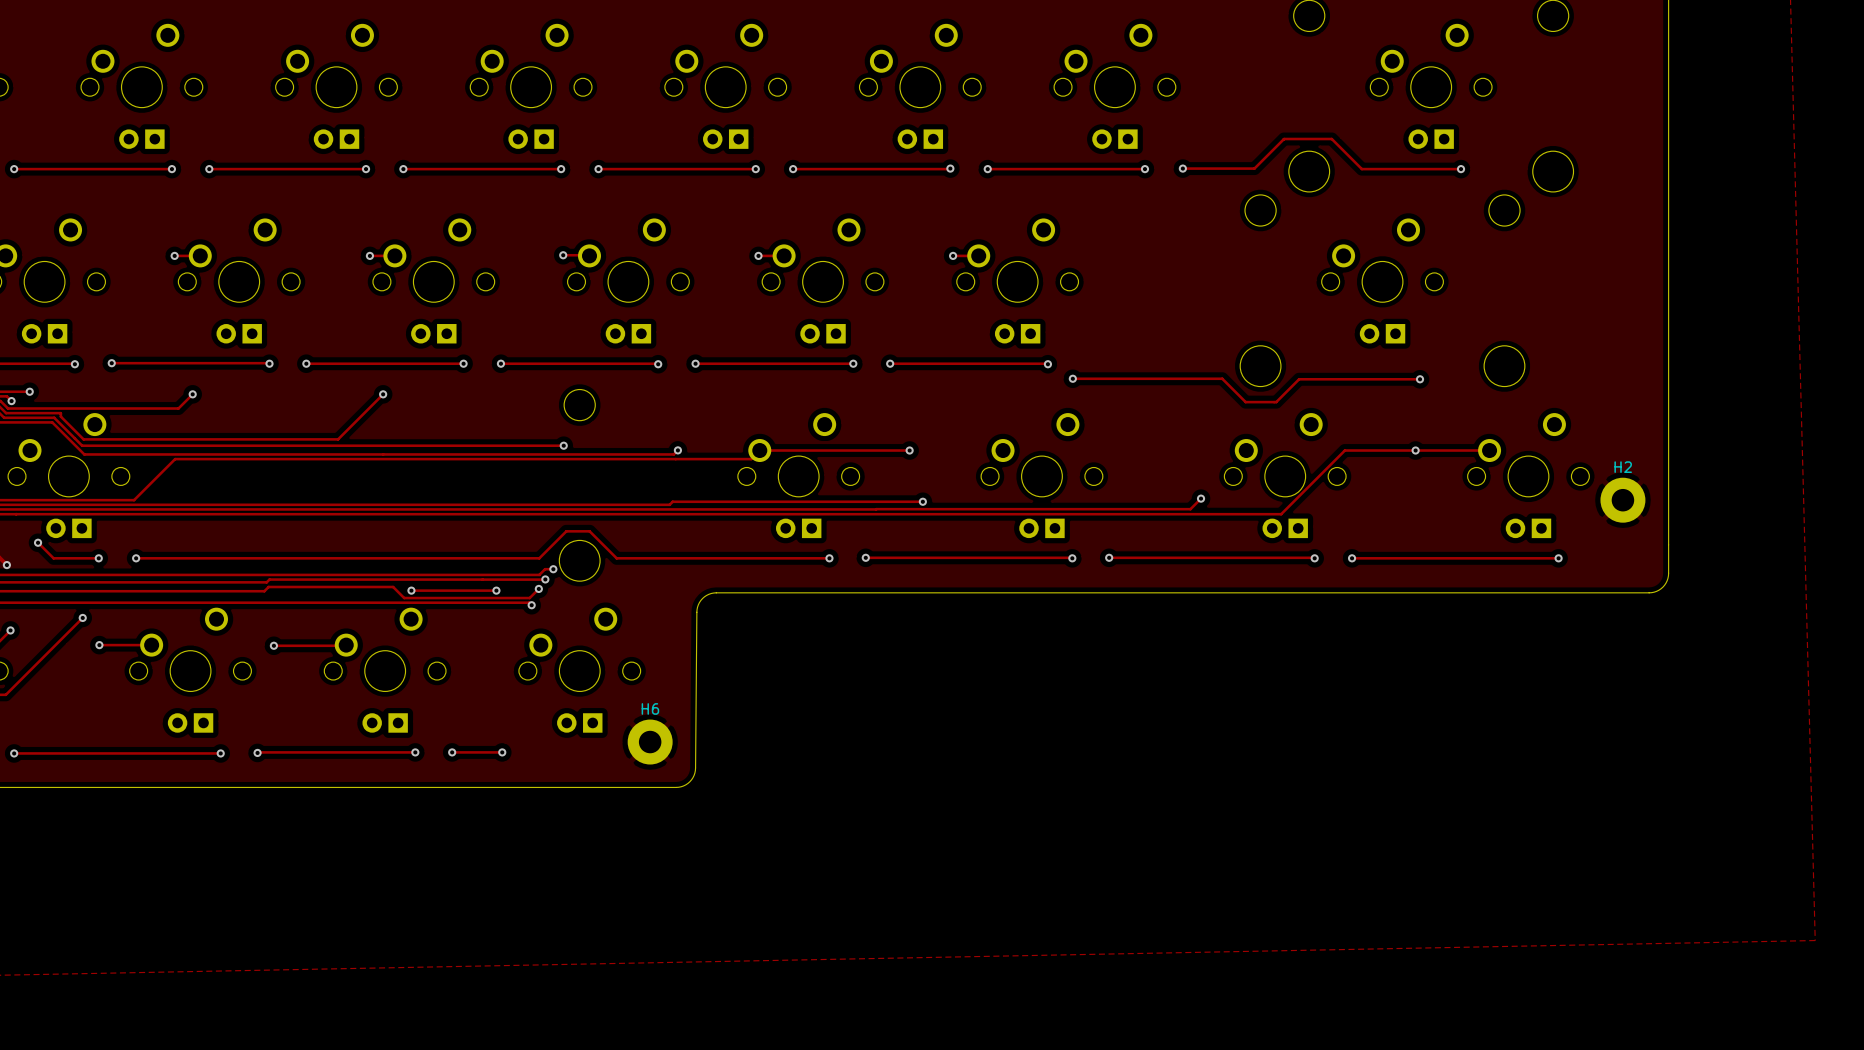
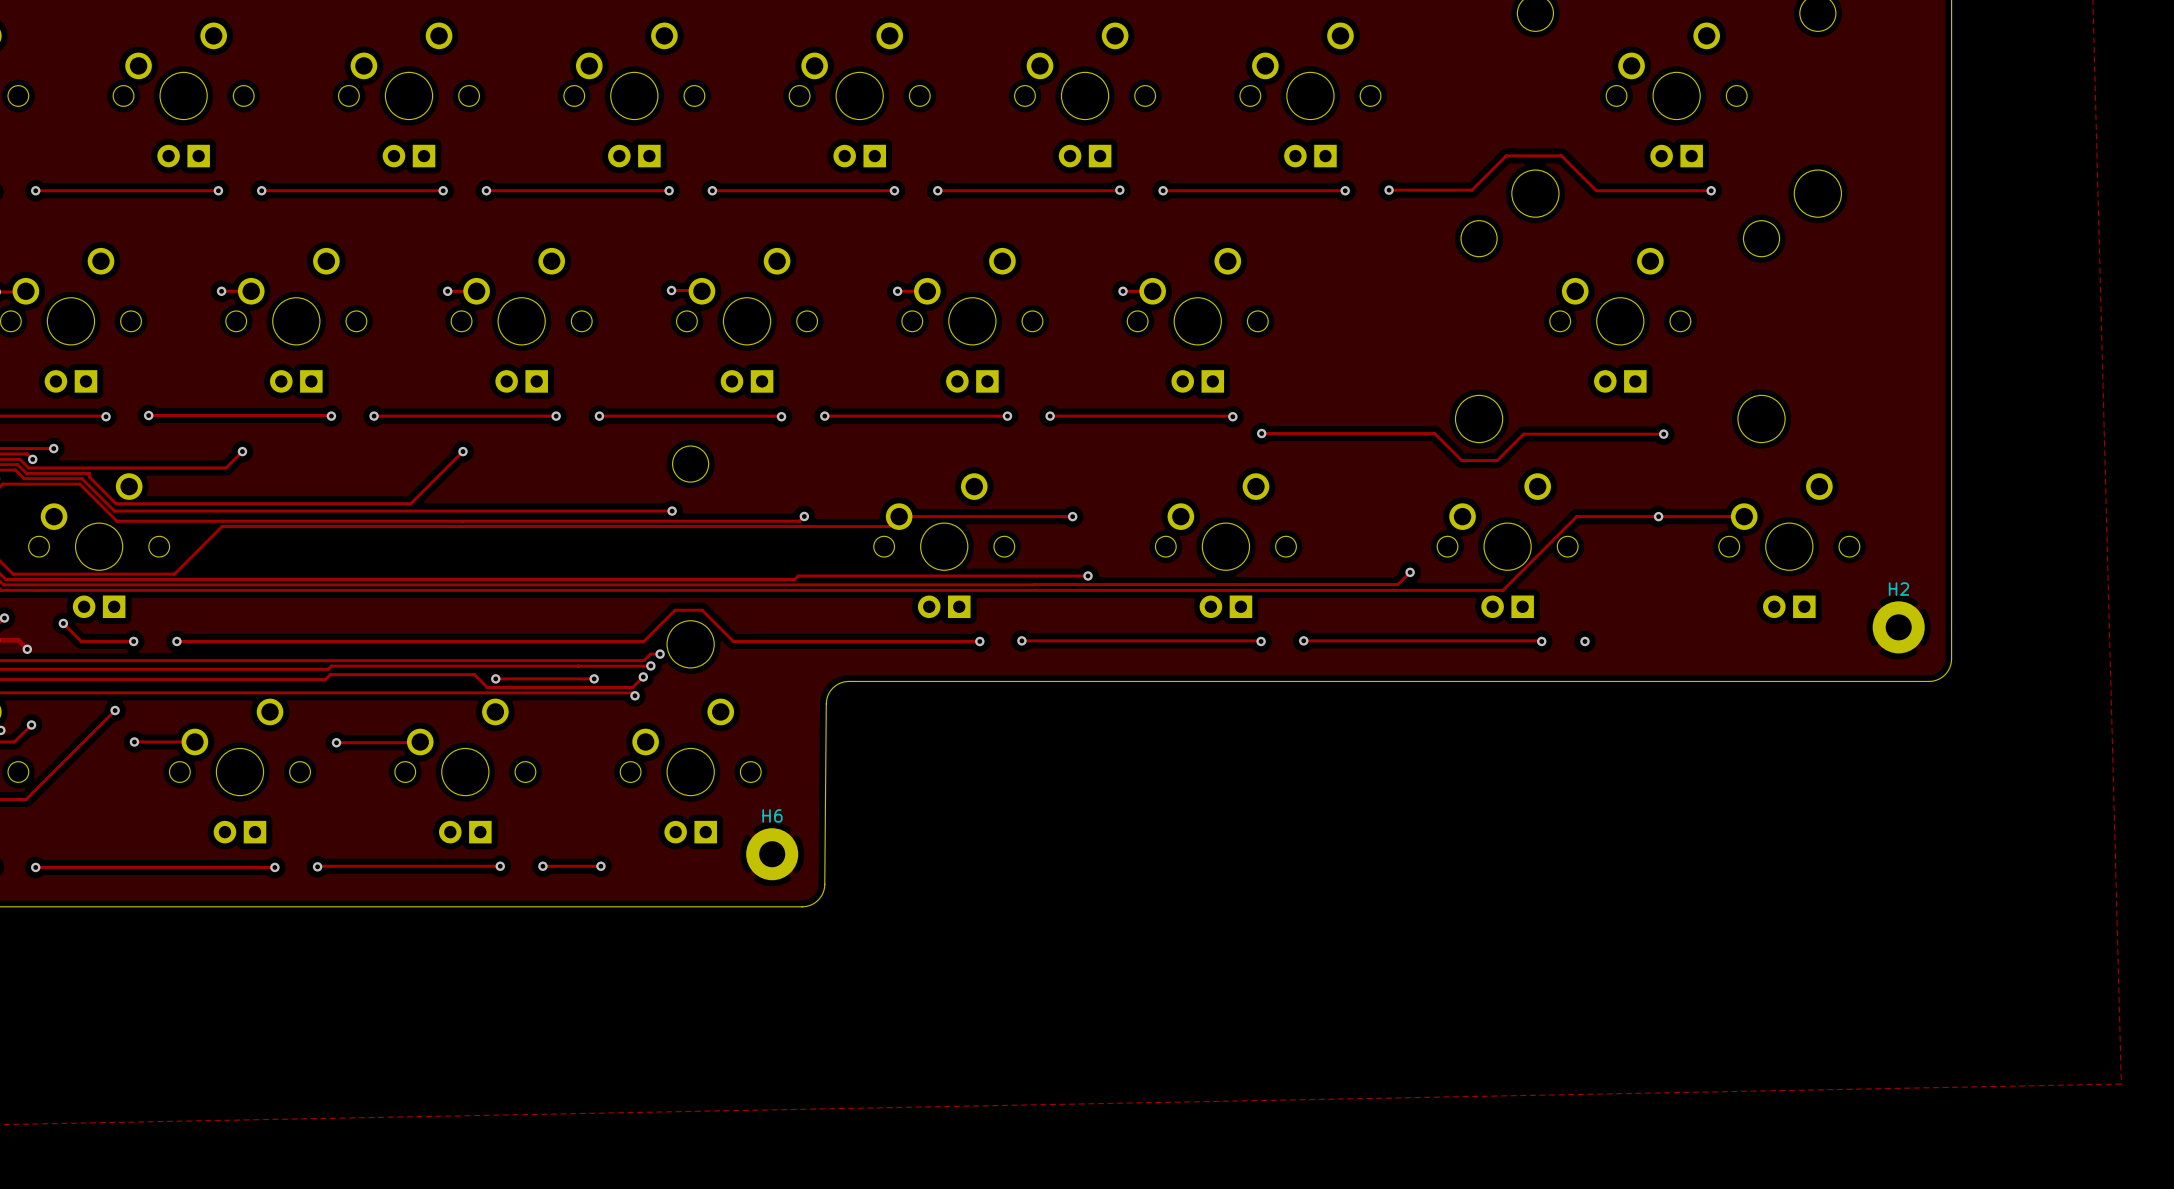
H2 position: (1622, 500) -> (1898, 627)
track: (1352, 558) (1558, 558) -> none
via: (1558, 558) -> none

